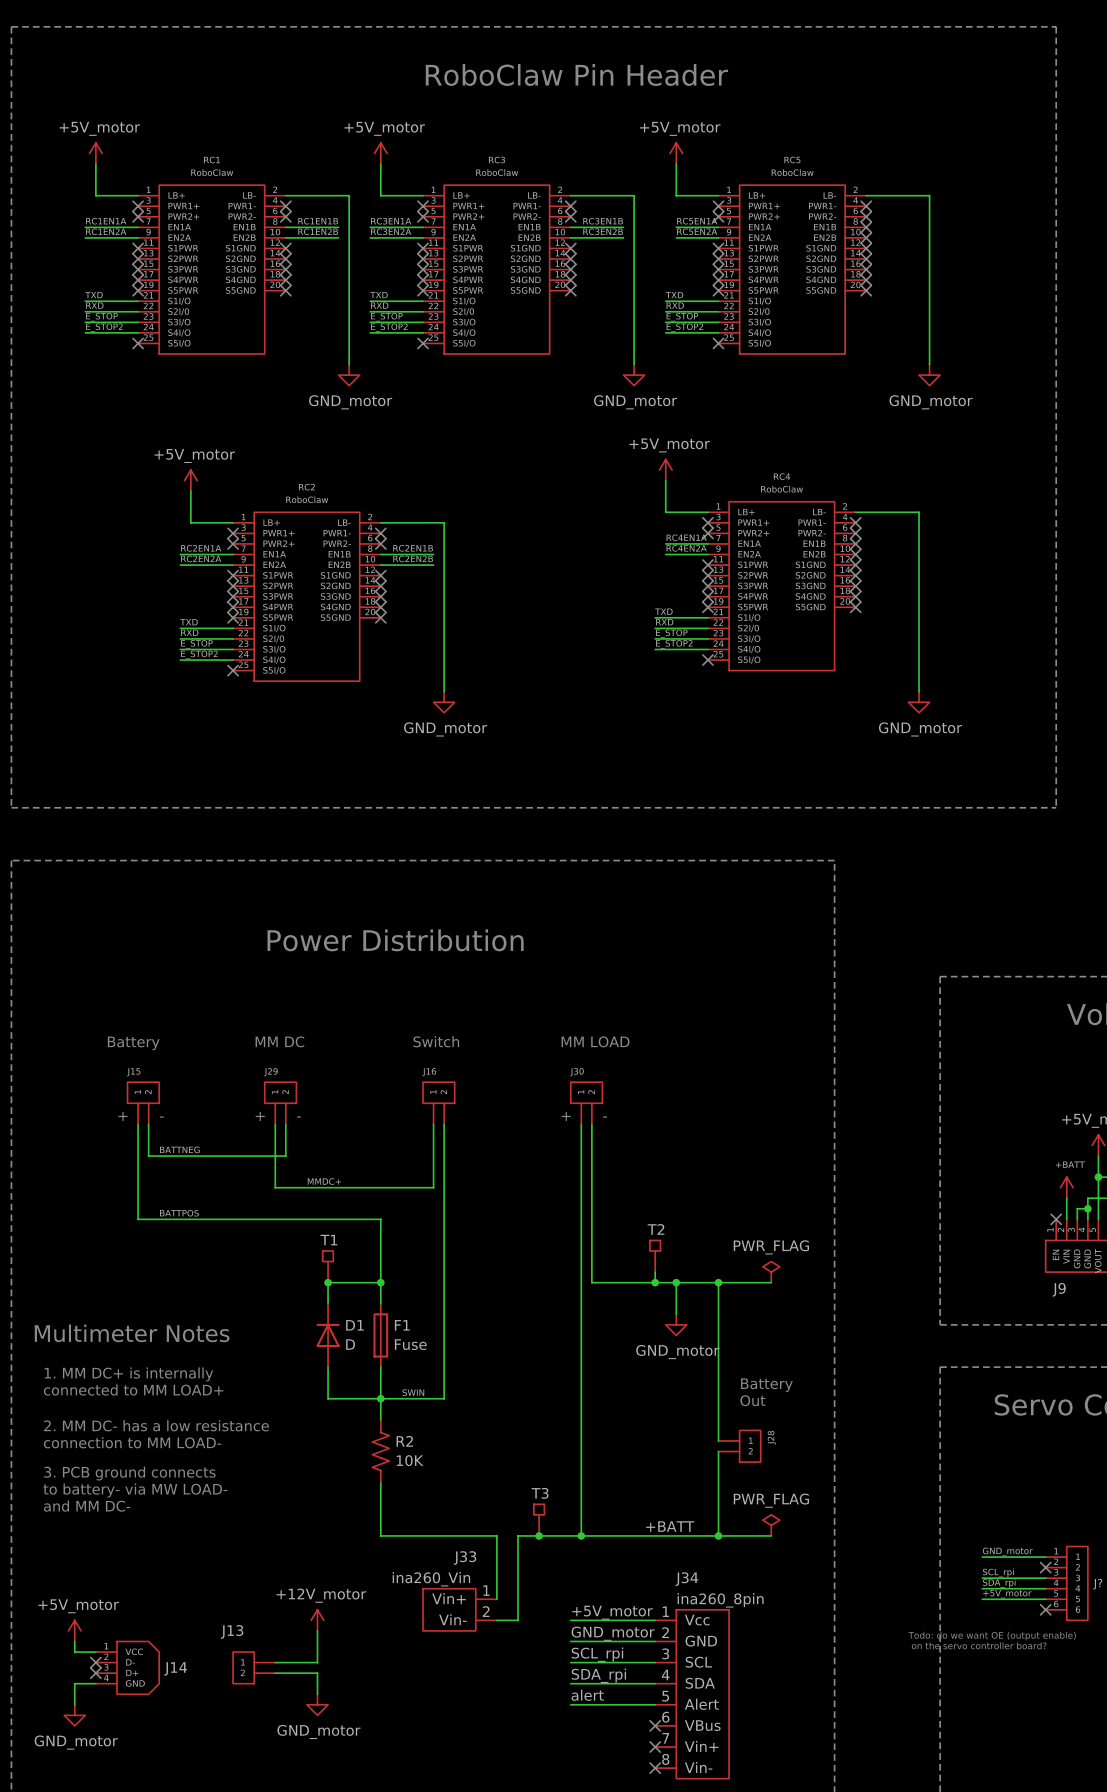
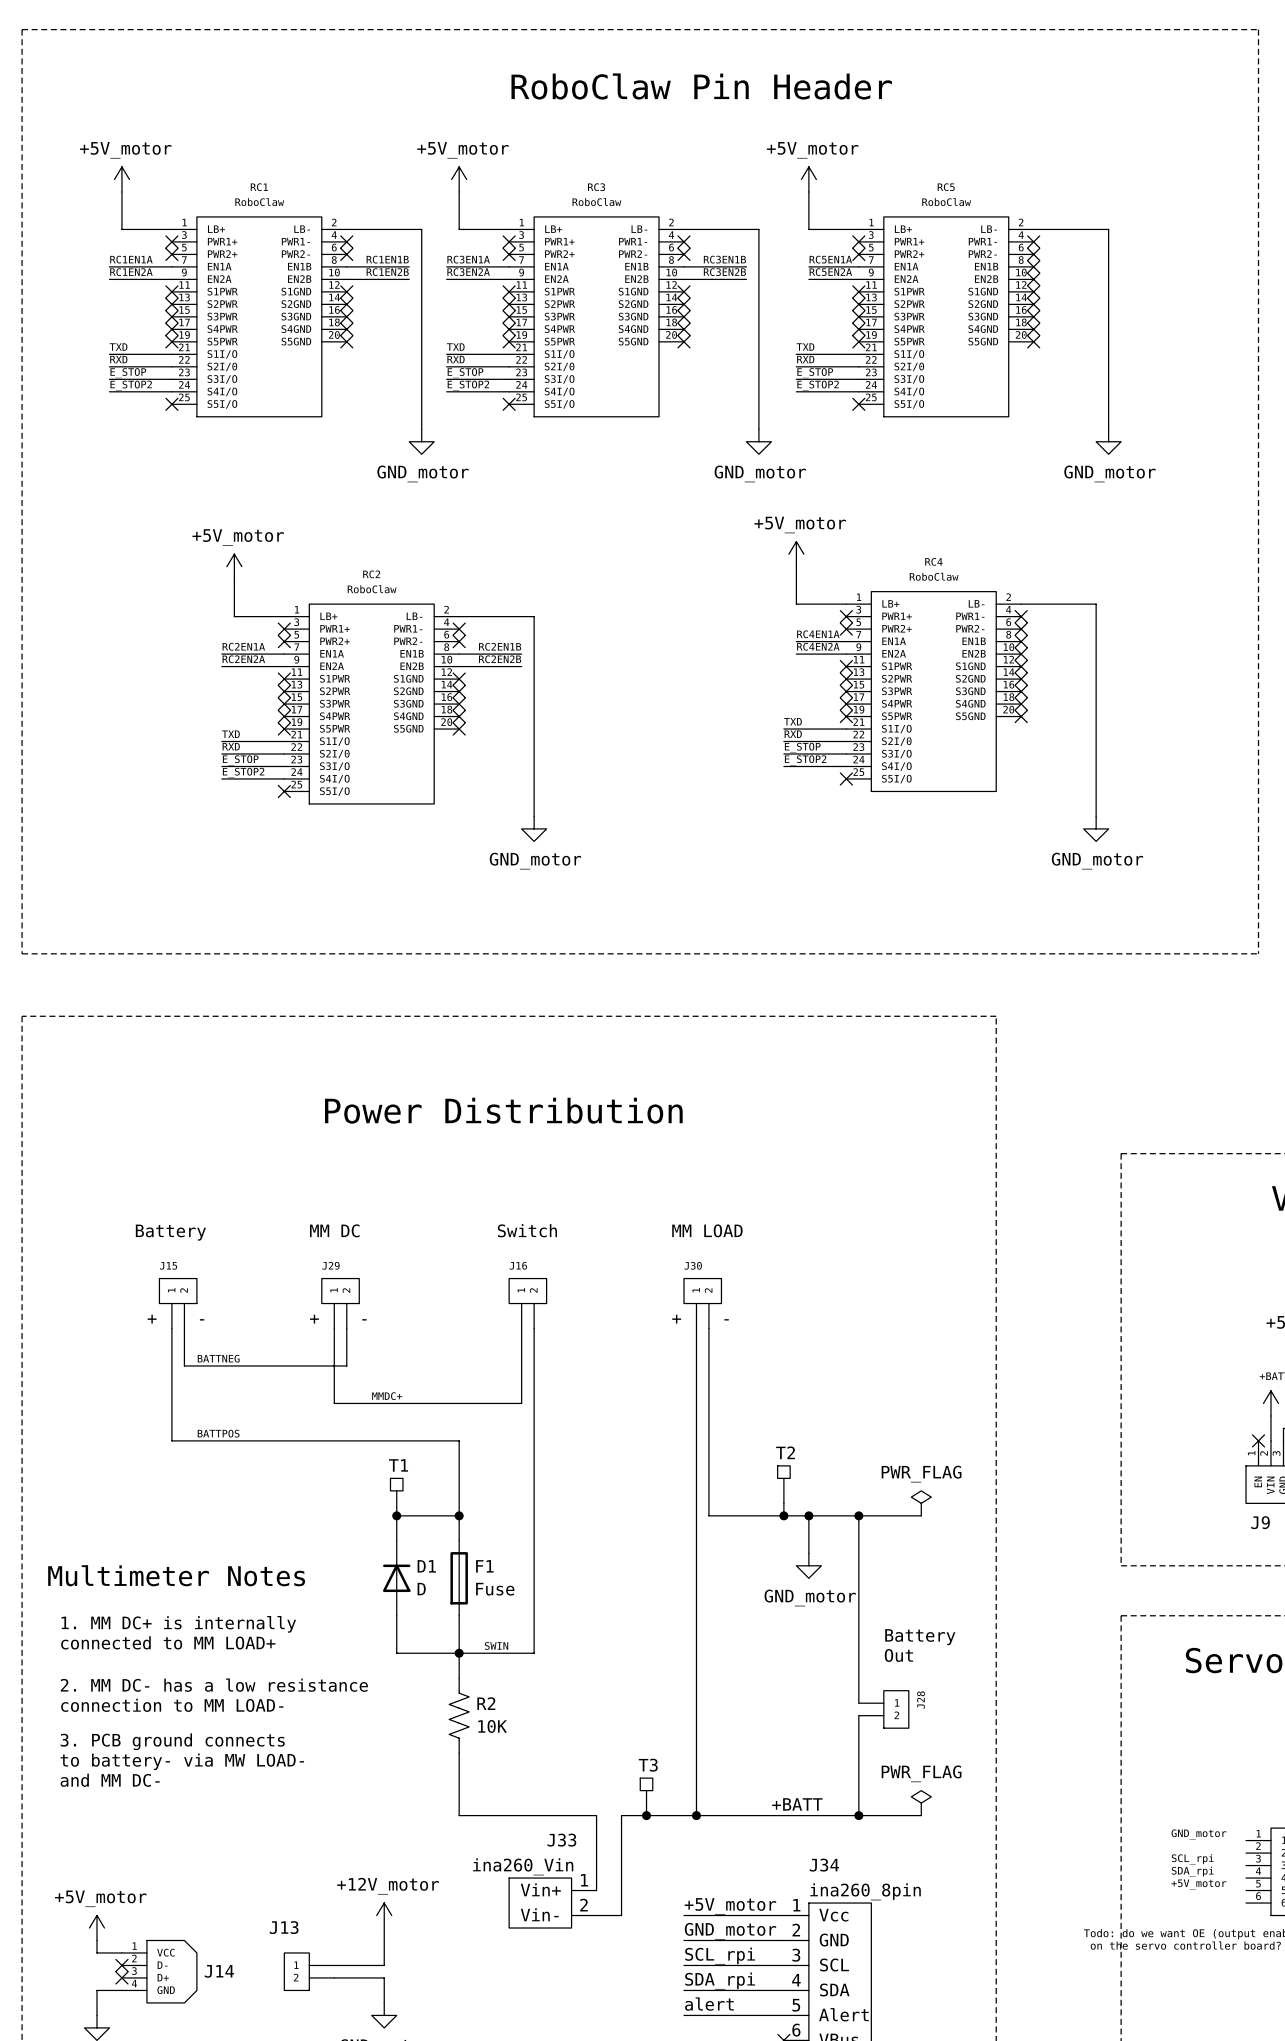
wire: (982, 1557) (1045, 1557) -> none
no-connect mark: (1045, 1567) -> none
wire: (982, 1578) (1045, 1578) -> none
wire: (982, 1588) (1045, 1588) -> none
wire: (982, 1599) (1045, 1599) -> none
no-connect mark: (1045, 1609) -> none

